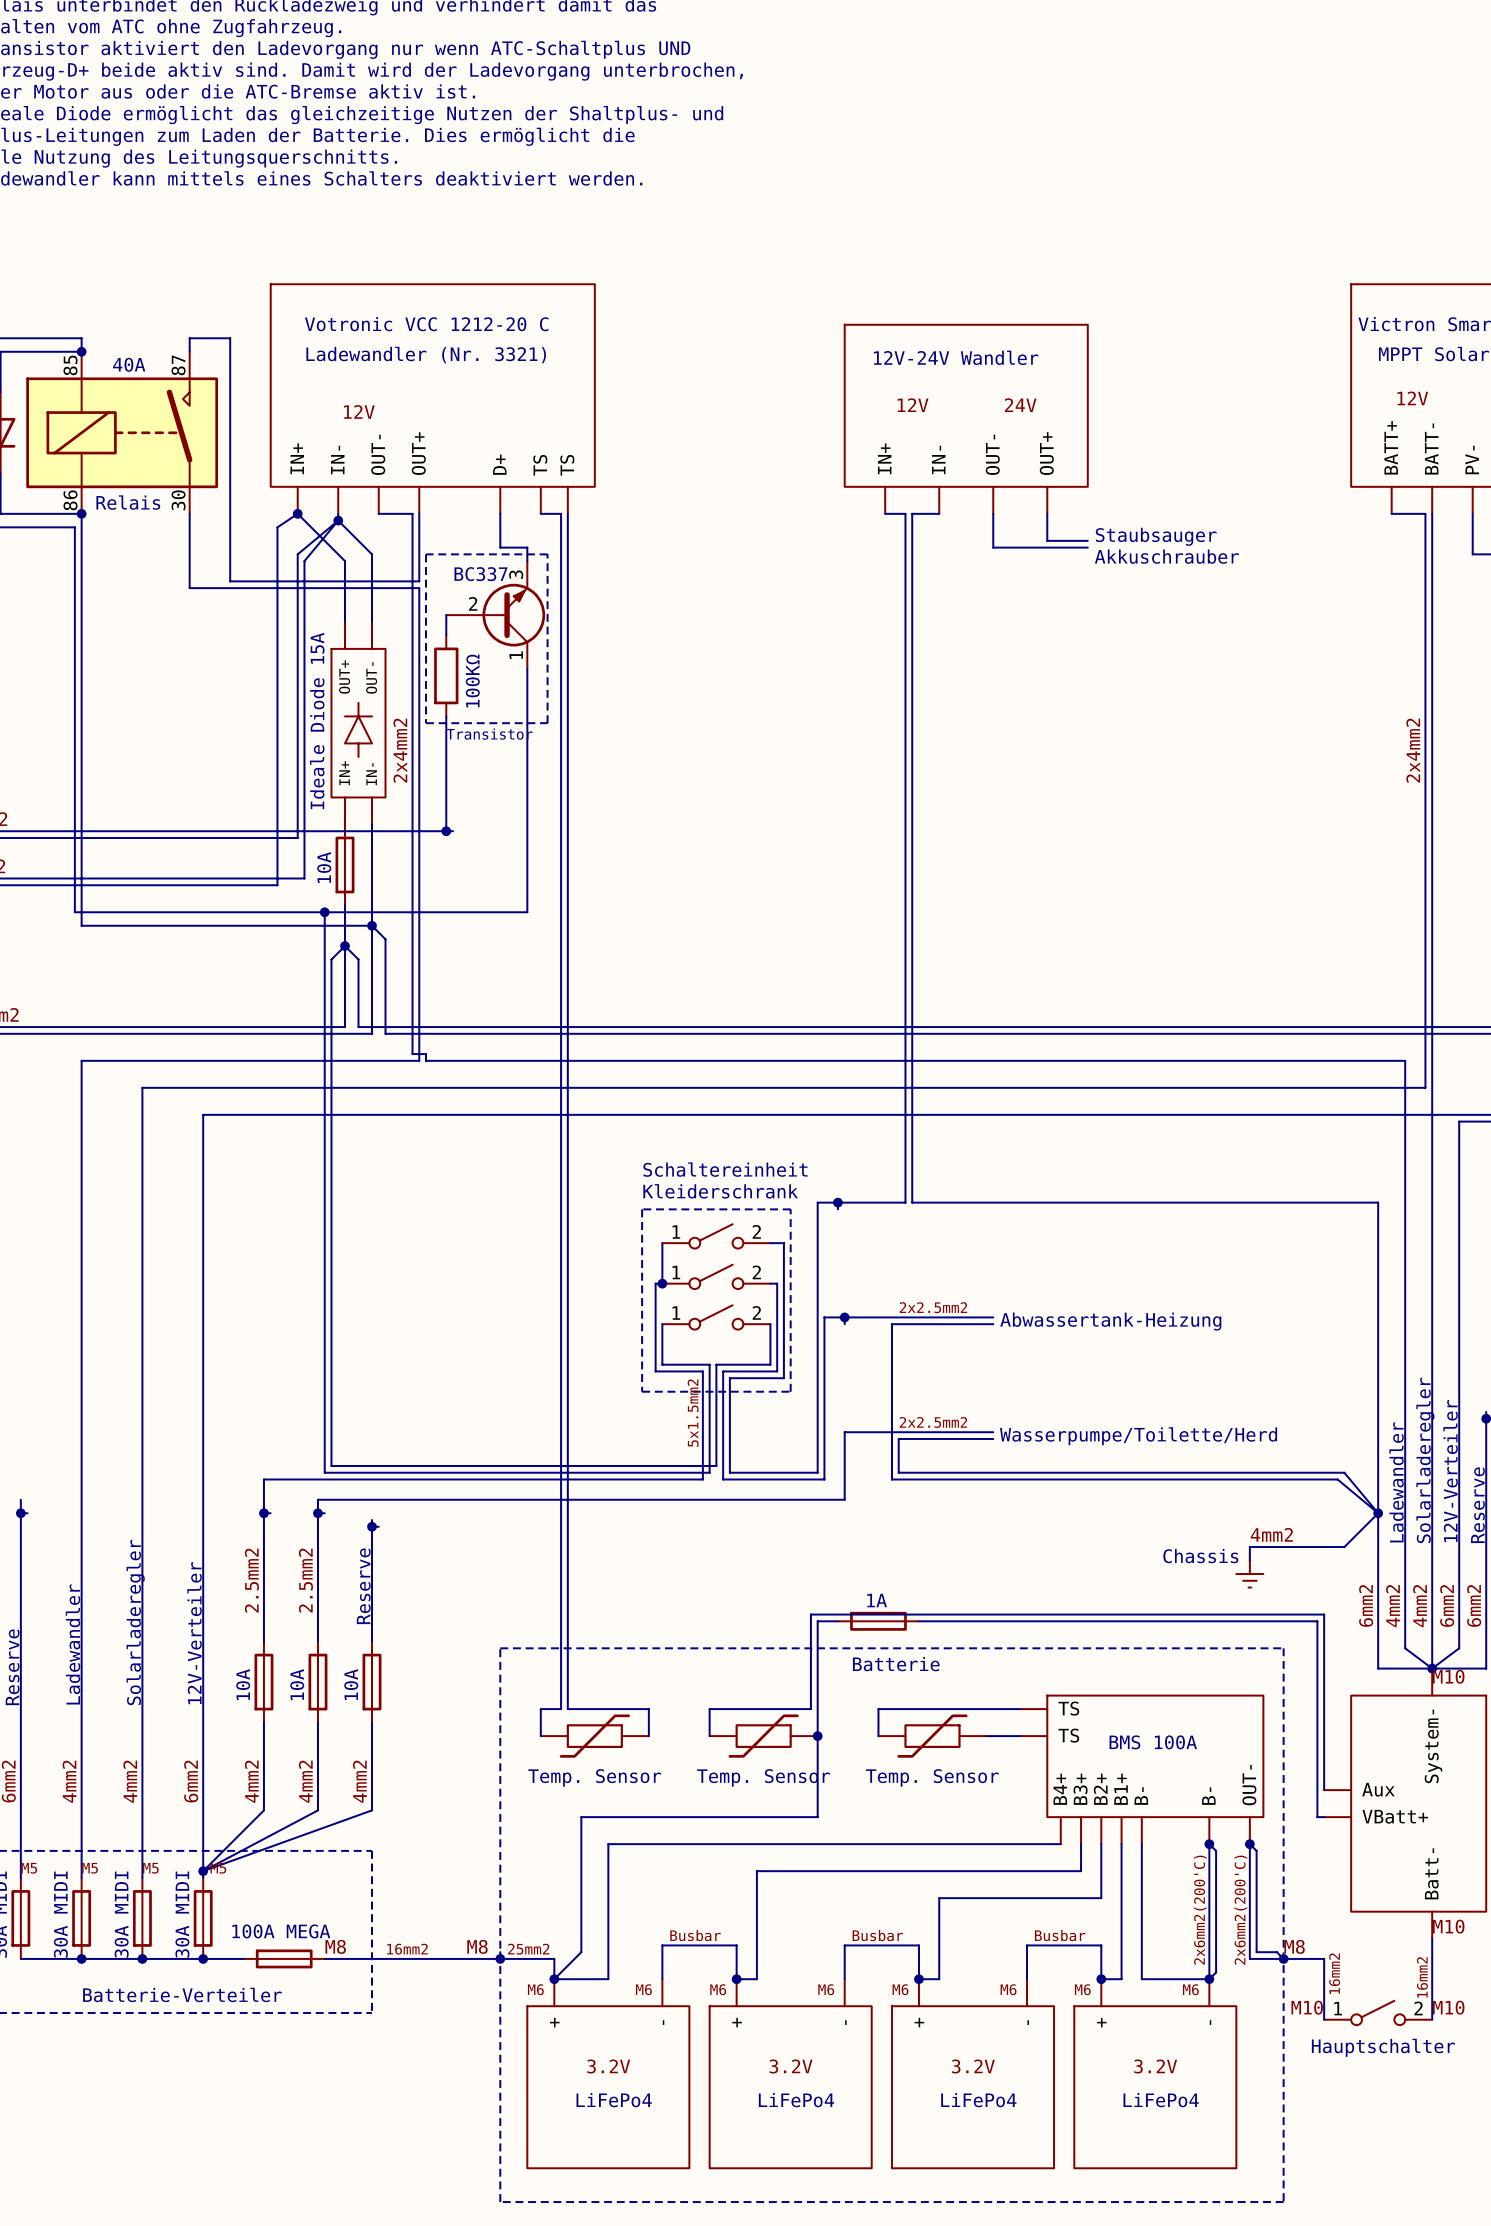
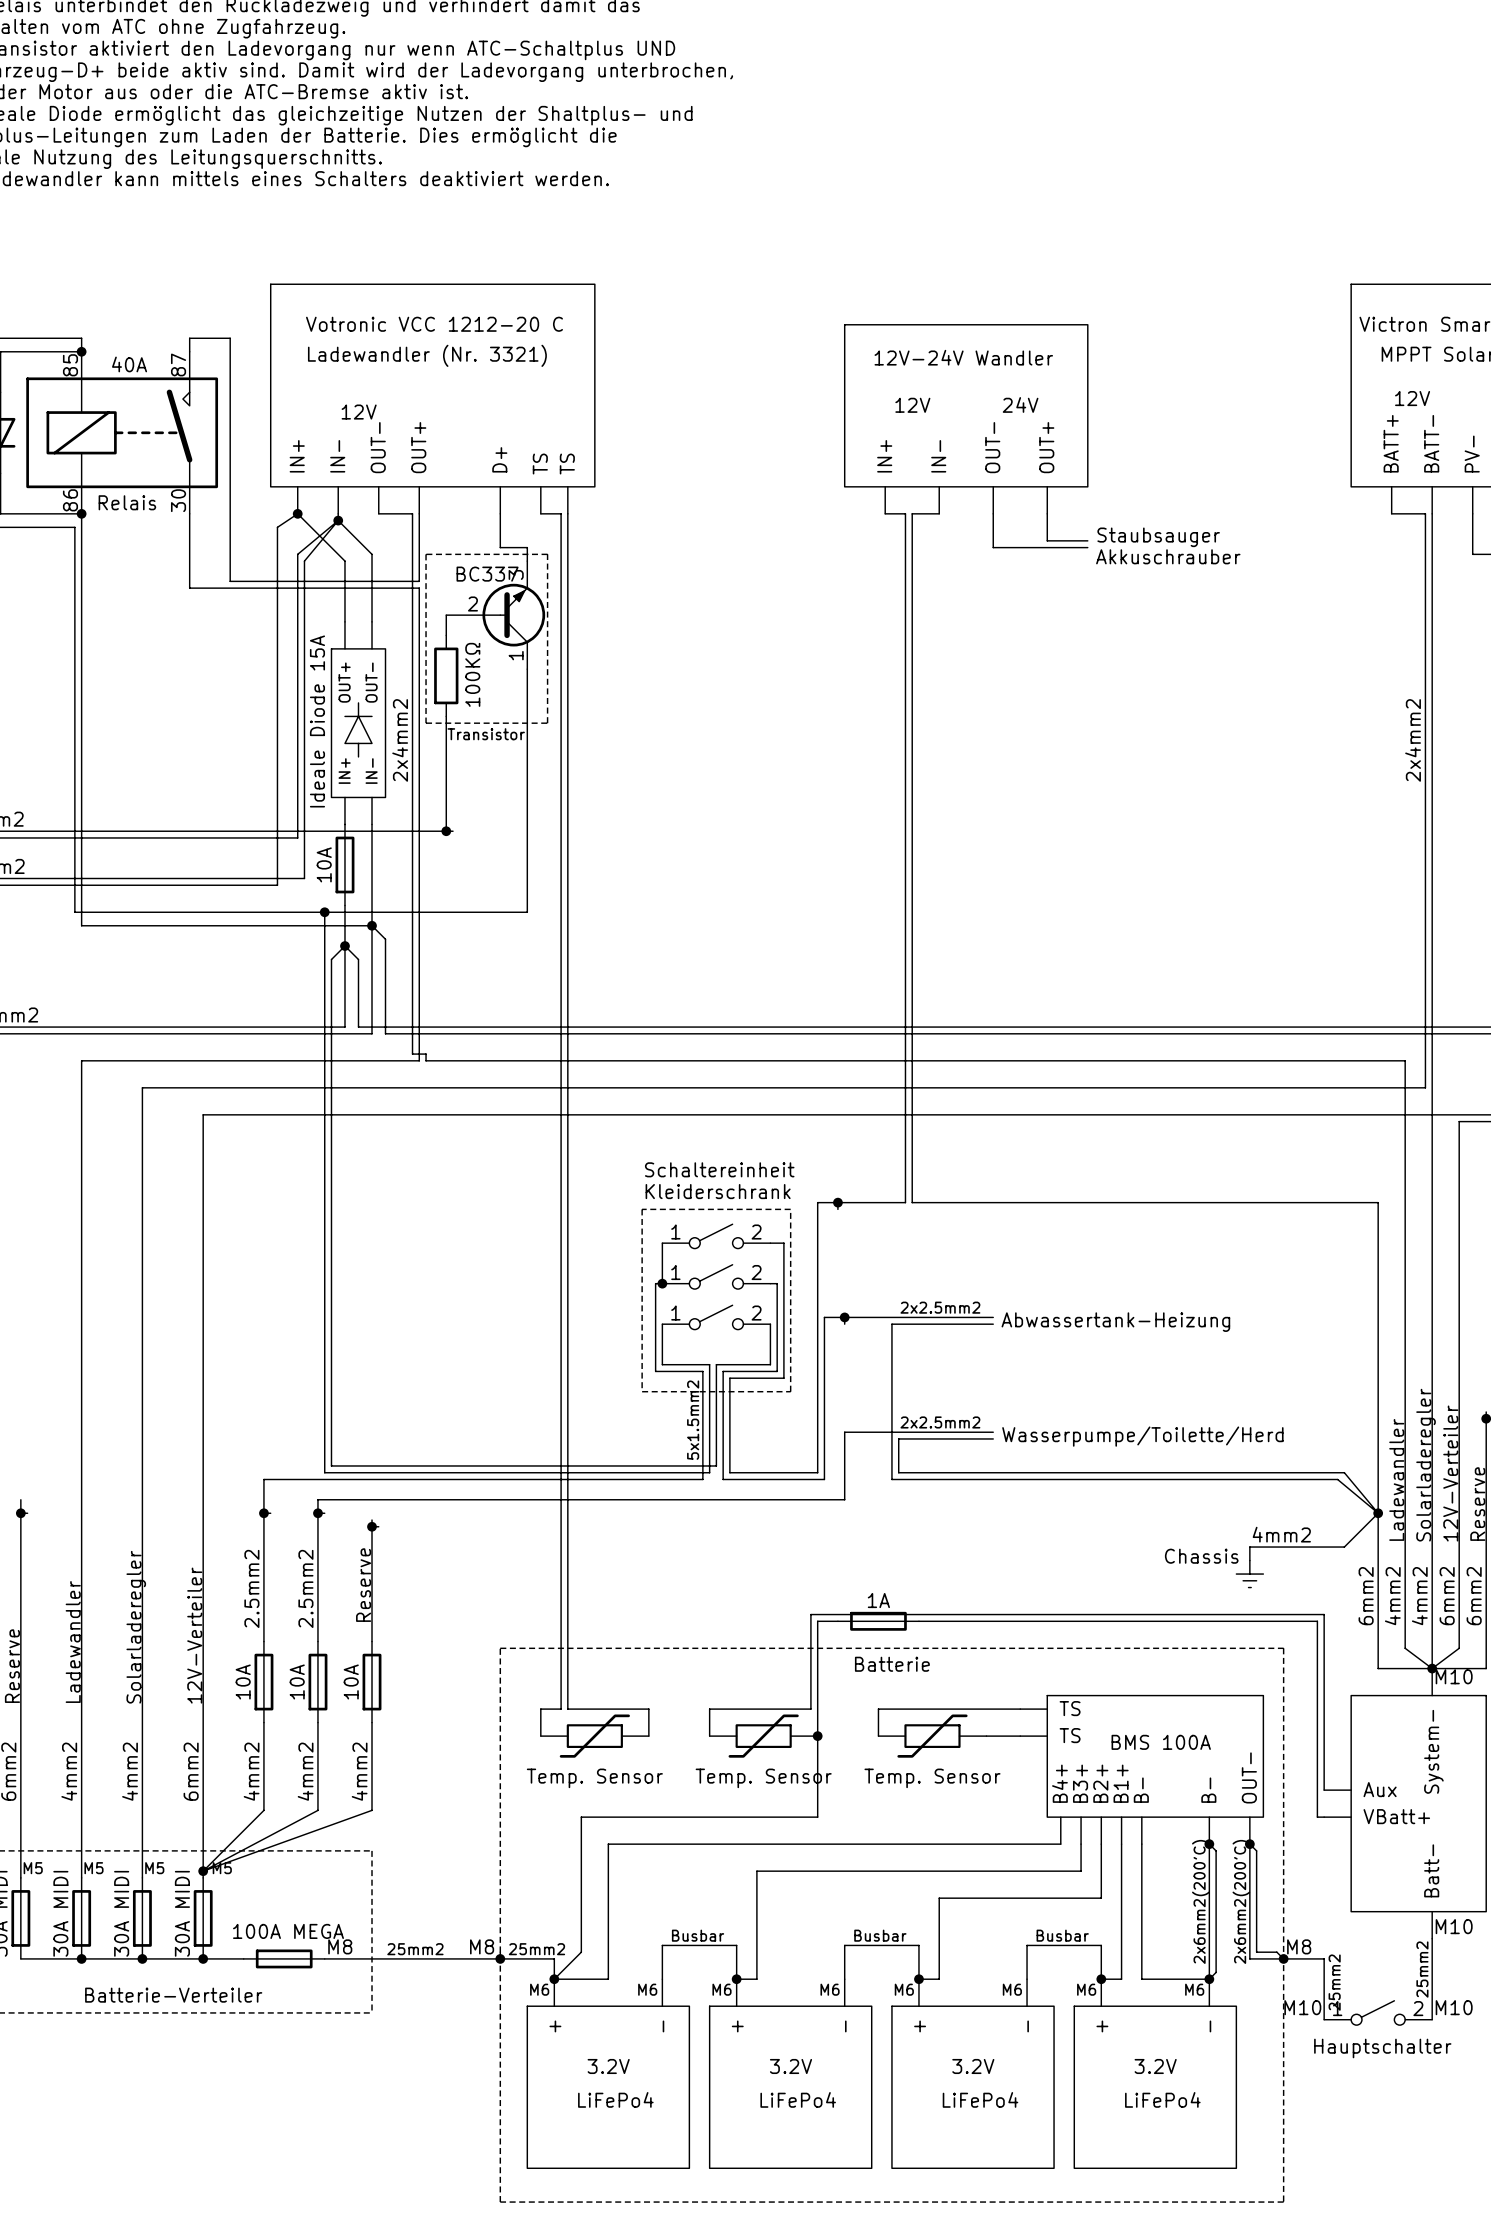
label: 16mm2 (407, 1949) -> 25mm2 (415, 1949)
label: 16mm2 (1334, 1973) -> 25mm2 (1334, 1982)
label: 16mm2 (1422, 1977) -> 25mm2 (1422, 1969)

